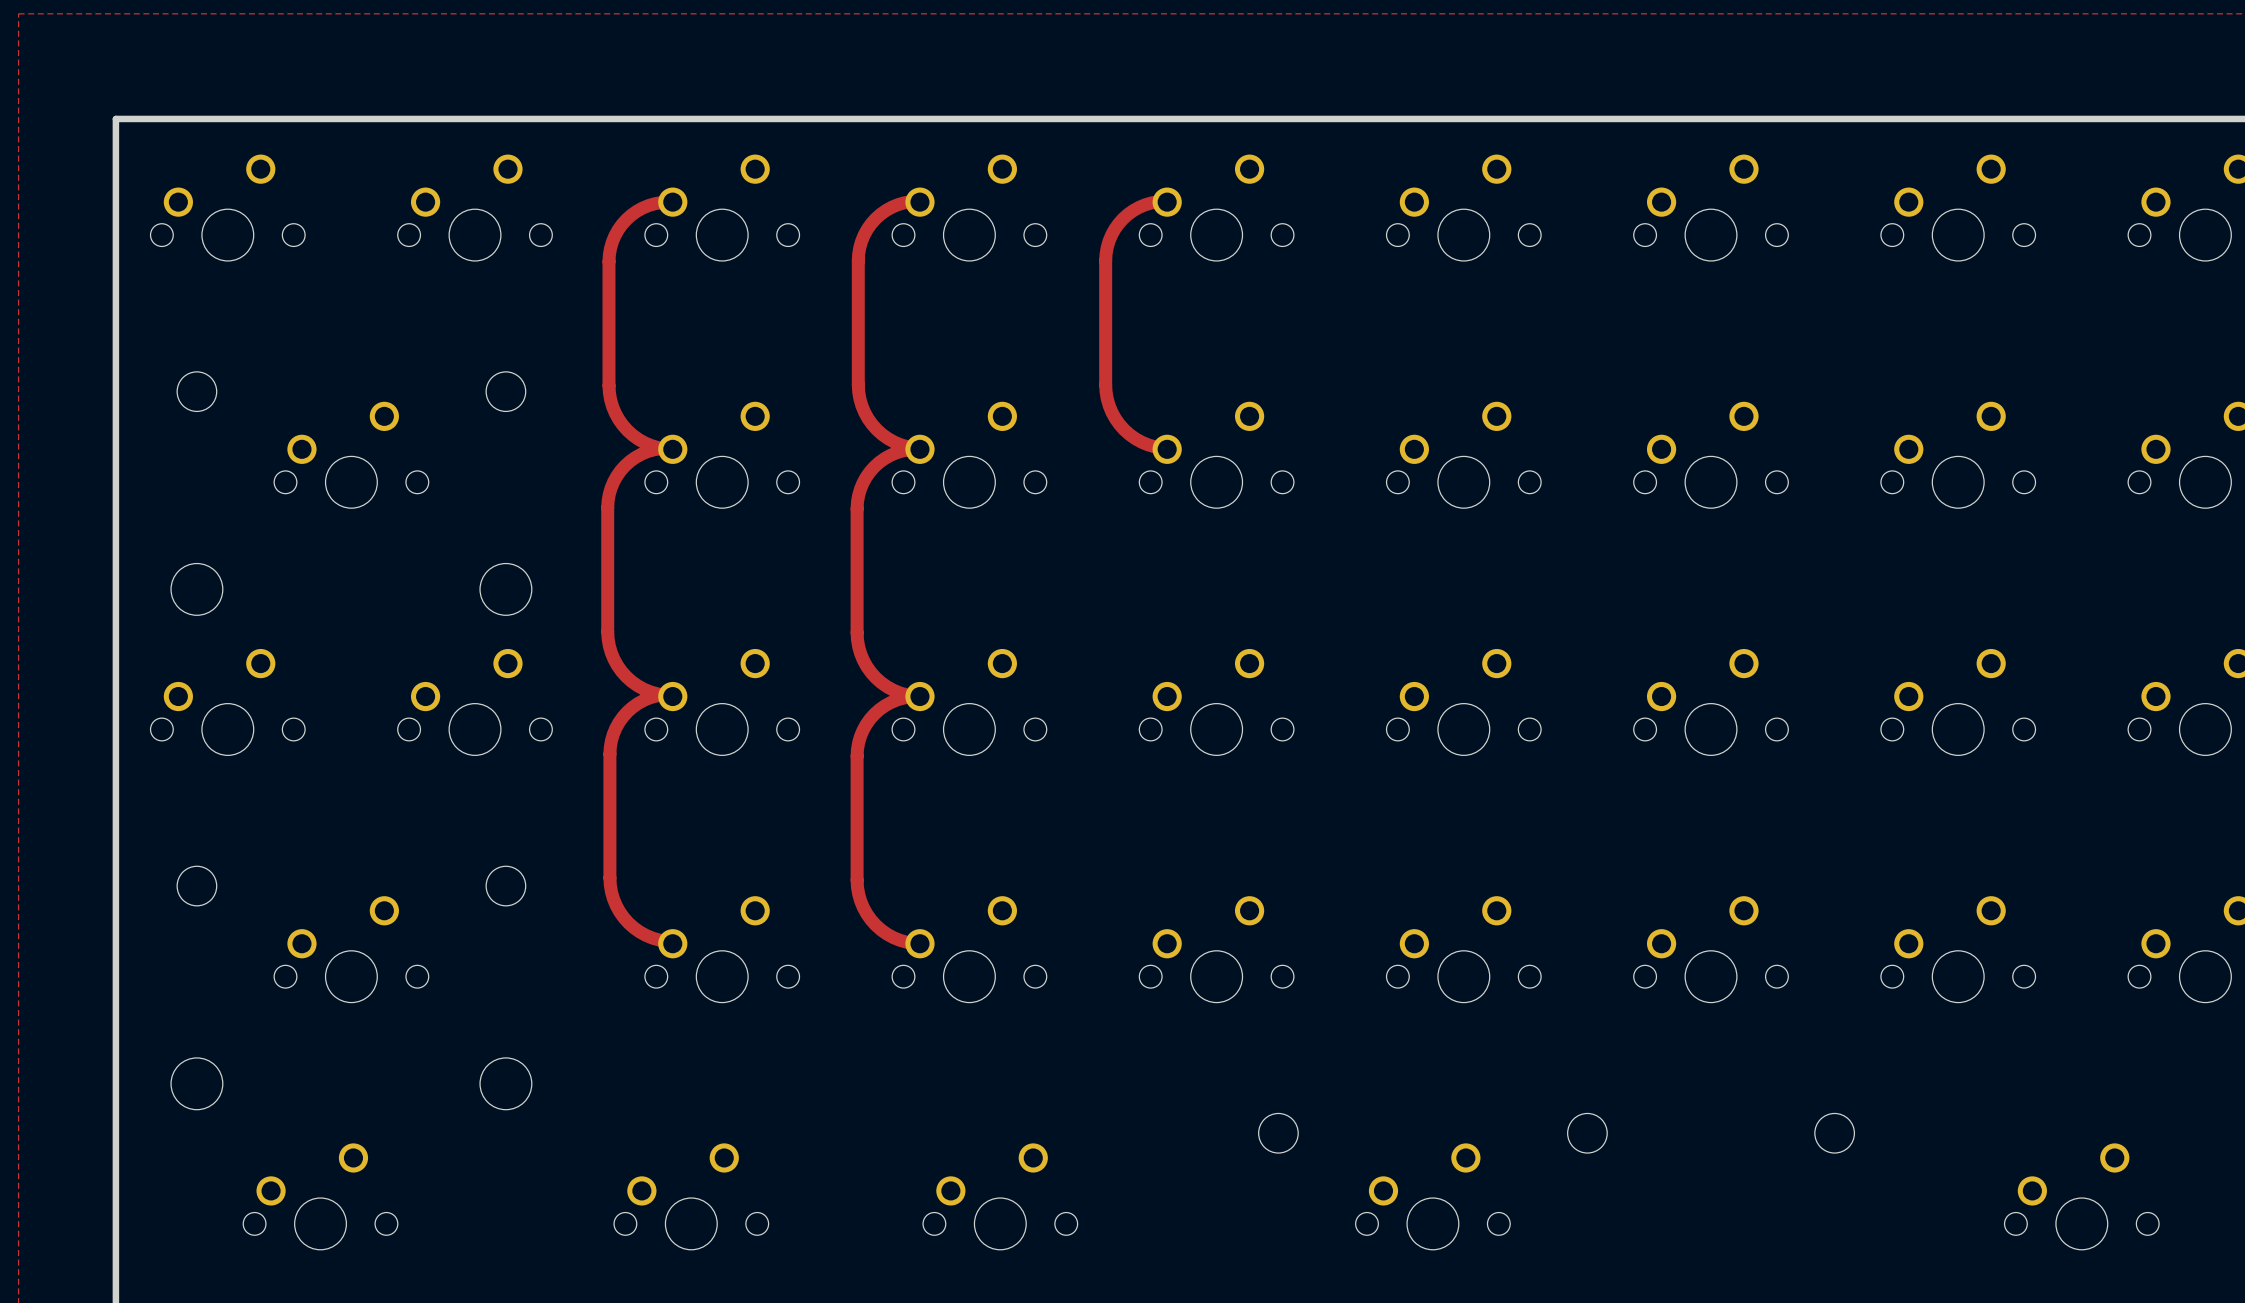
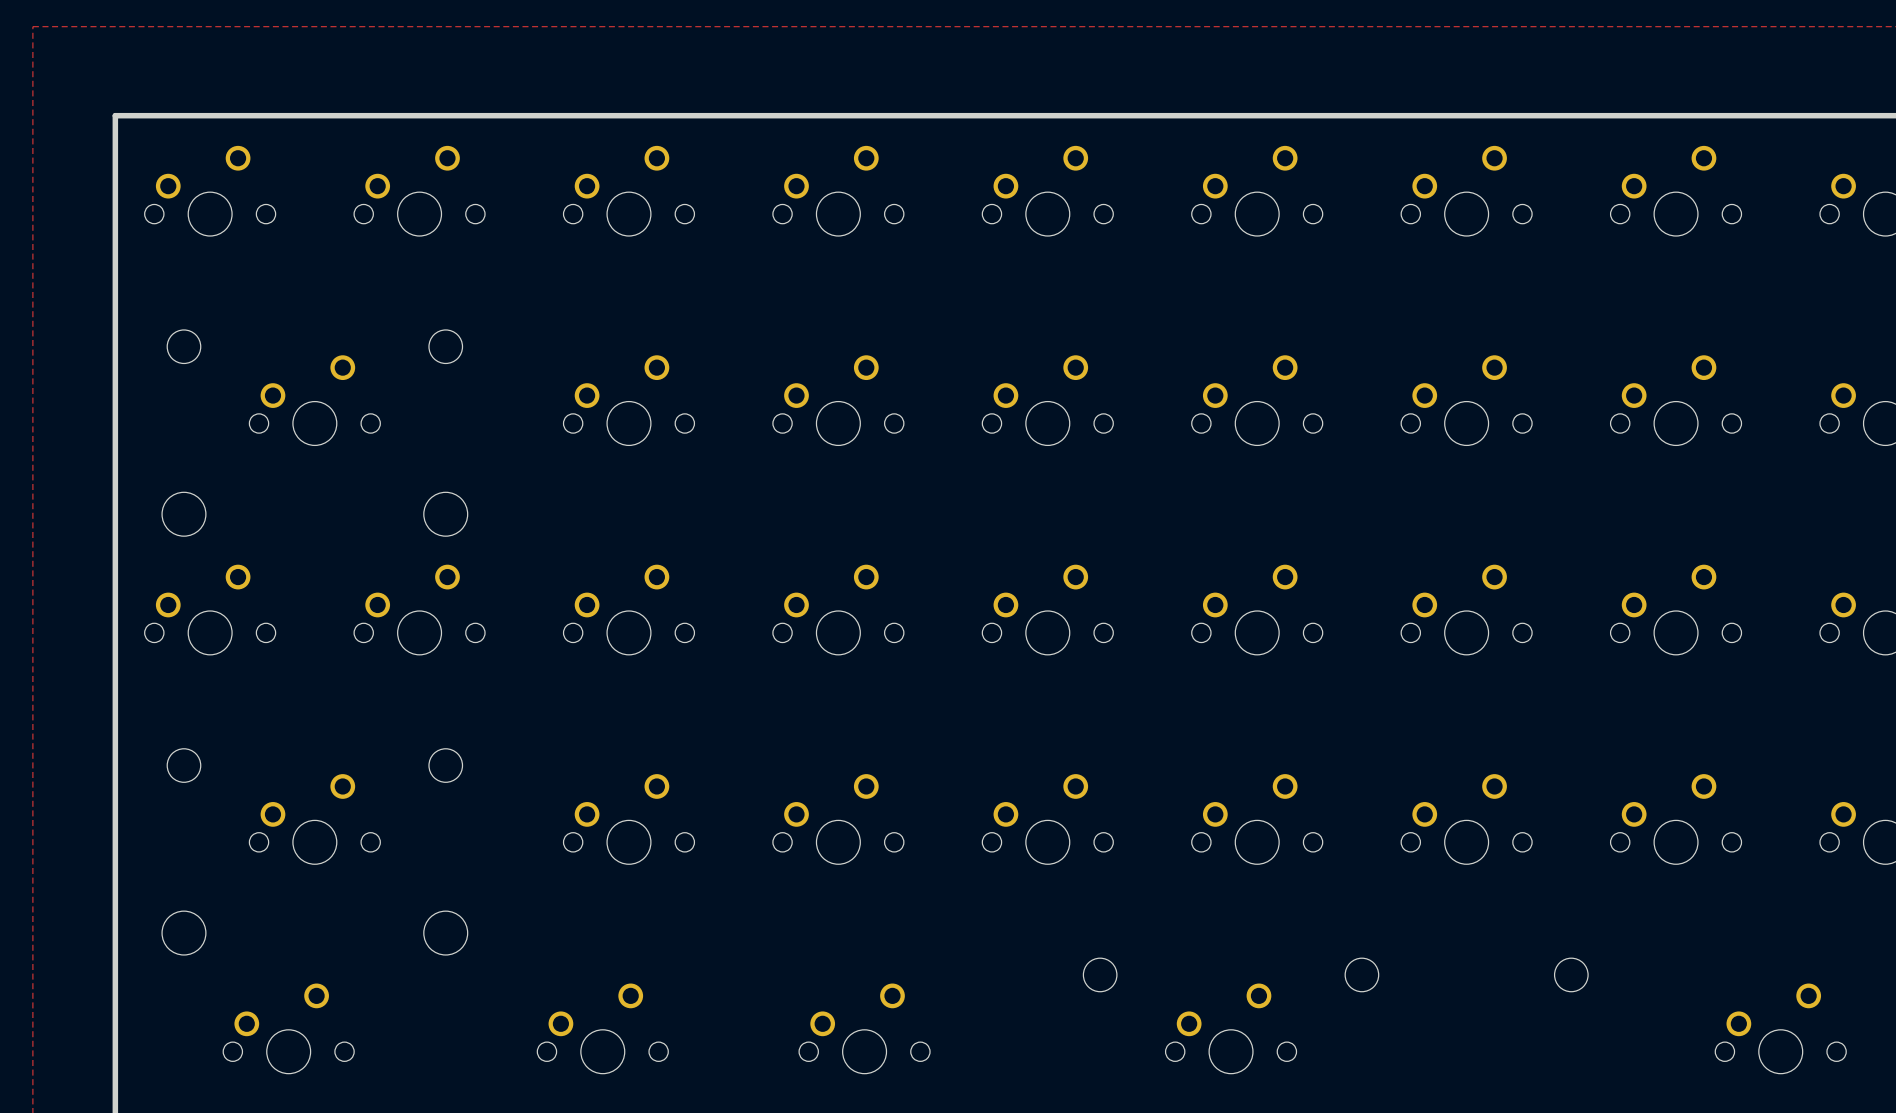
track: (917, 201) (898, 204) (880, 214) (871, 223) (861, 241) (858, 260) (858, 384) (861, 405) (868, 418) (876, 429) (894, 442) (907, 446) (922, 448) -> none
track: (1165, 201) (1151, 202) (1133, 210) (1118, 223) (1109, 241) (1105, 260) (1105, 384) (1107, 398) (1111, 412) (1124, 429) (1141, 442) (1155, 446) (1169, 448) -> none
track: (672, 202) (648, 205) (626, 219) (614, 235) (609, 261) (609, 385) (612, 406) (622, 425) (638, 439) (658, 447) (672, 449) -> none
track: (667, 448) (647, 451) (635, 457) (620, 470) (611, 488) (607, 507) (607, 631) (609, 645) (614, 659) (626, 676) (637, 685) (650, 691) (671, 695) -> none
track: (916, 449) (896, 452) (884, 458) (870, 471) (860, 489) (857, 508) (857, 632) (860, 653) (866, 666) (875, 677) (886, 686) (899, 692) (920, 696) -> none
track: (669, 694) (656, 696) (637, 703) (622, 716) (613, 734) (609, 754) (609, 877) (611, 892) (616, 905) (628, 923) (646, 935) (659, 940) (673, 941) -> none
track: (916, 696) (903, 698) (884, 705) (870, 719) (860, 736) (857, 756) (857, 880) (858, 894) (863, 907) (875, 925) (886, 934) (899, 940) (920, 943) -> none

